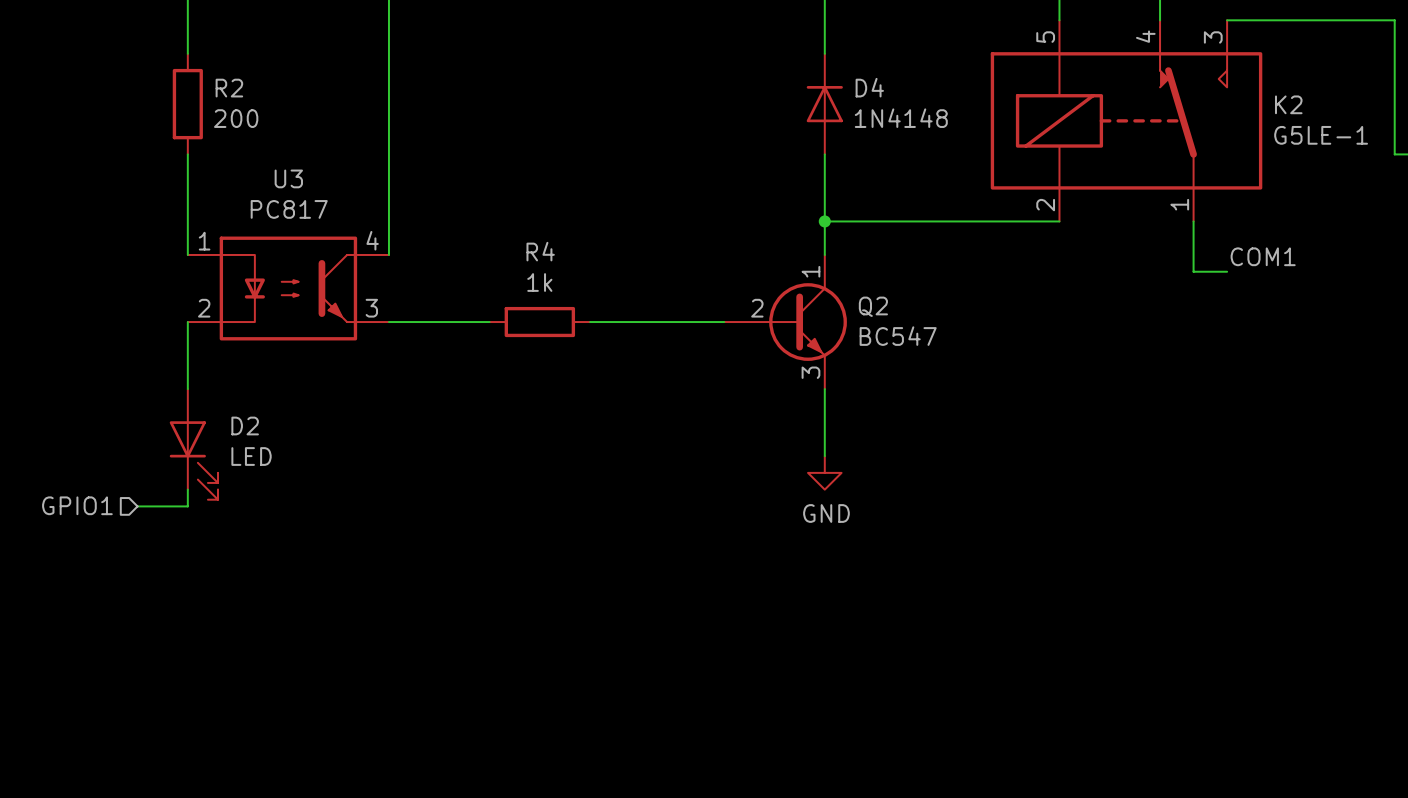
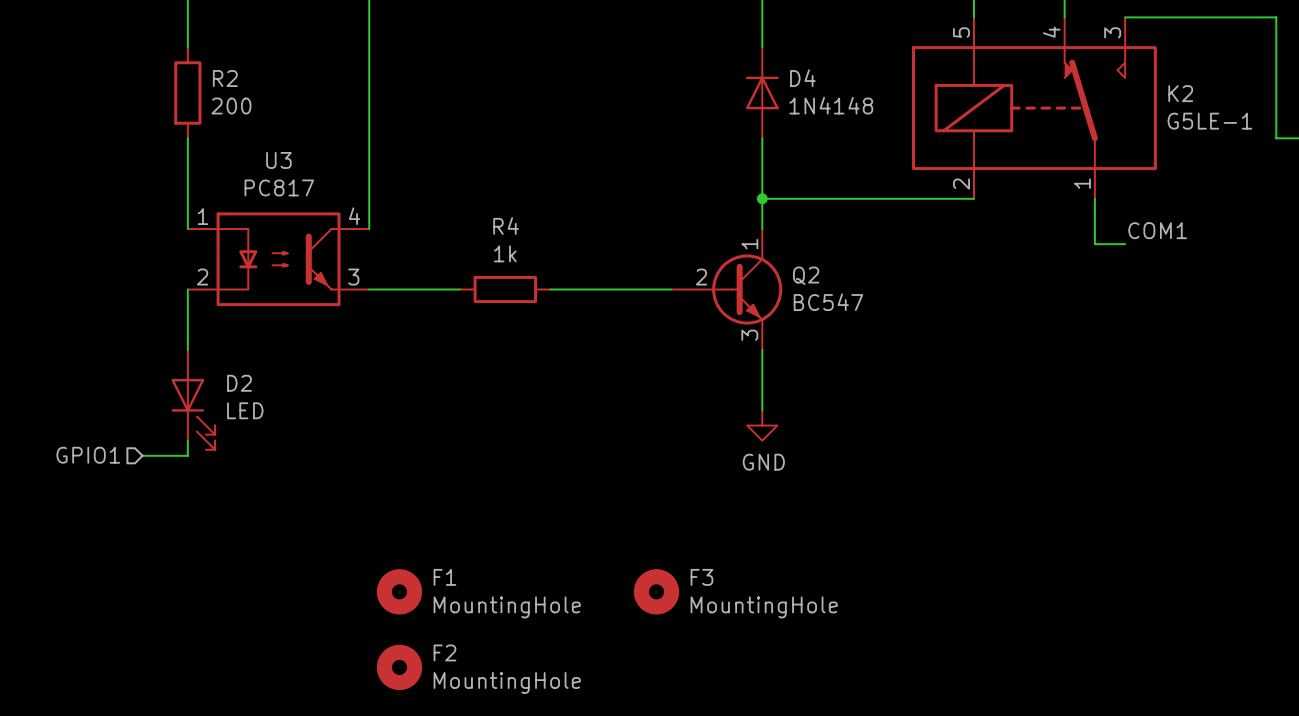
F1: none -> MountingHole (399, 591)
F3: none -> MountingHole (656, 591)
F2: none -> MountingHole (399, 667)

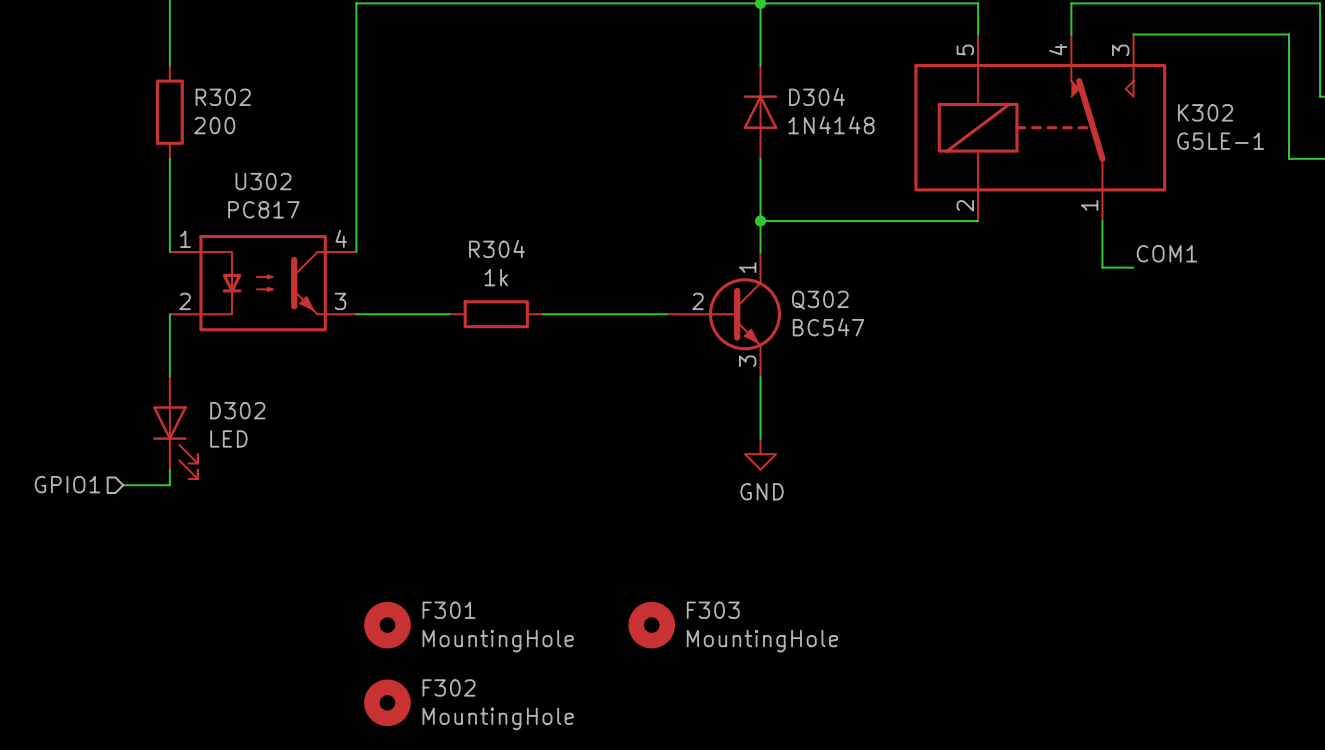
R2 name: R2 (225, 78) -> R302 (223, 97)
D4 name: D4 (802, 78) -> D304 (817, 96)
K2 name: K2 (1180, 93) -> K302 (1205, 112)
U3 name: U3 (278, 160) -> U302 (263, 181)
R4 name: R4 (506, 225) -> R304 (497, 248)
Q2 name: Q2 (806, 275) -> Q302 (820, 300)
D2 name: D2 (239, 383) -> D302 (237, 410)
F1 name: F1 (444, 577) -> F301 (449, 610)
F3 name: F3 (701, 577) -> F303 (713, 610)
F2 name: F2 (444, 652) -> F302 (449, 687)

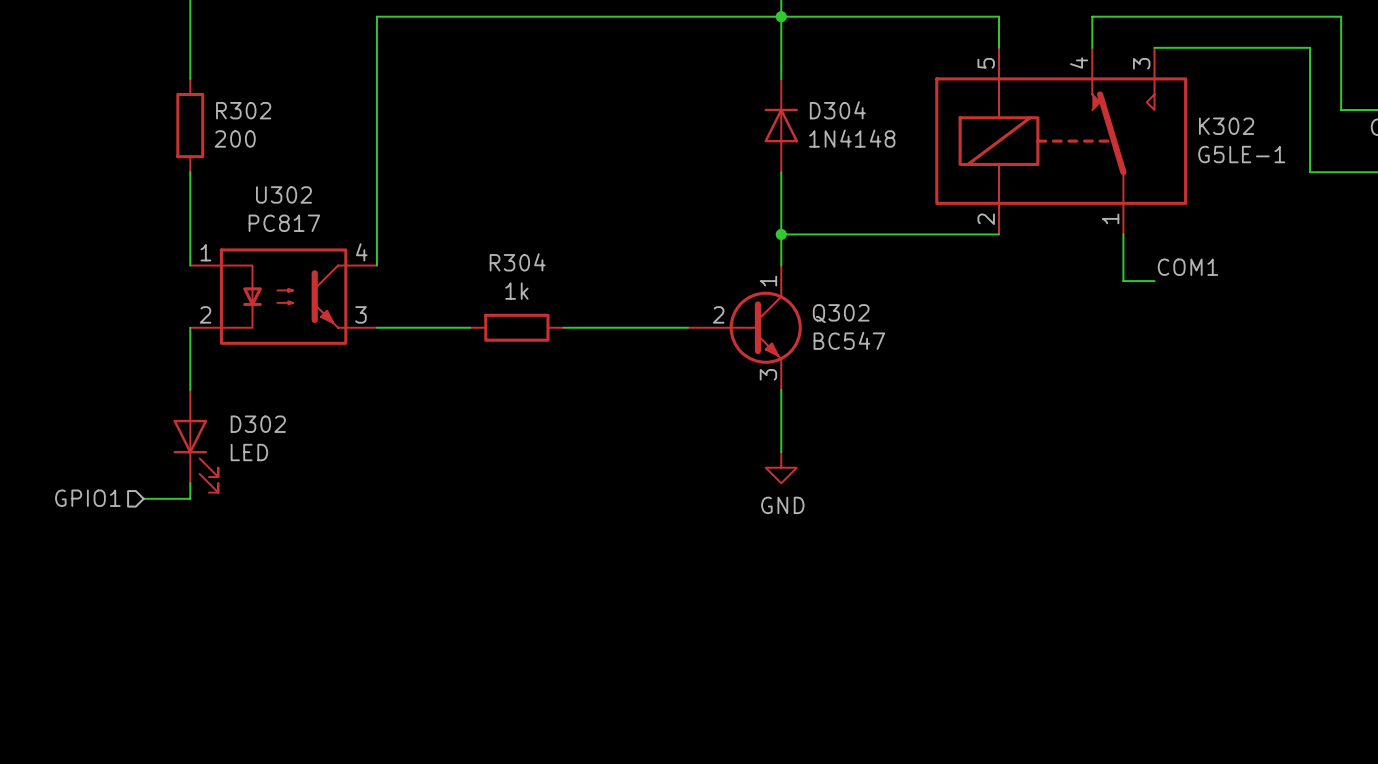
F301: MountingHole (387, 625) -> none
F303: MountingHole (651, 625) -> none
F302: MountingHole (387, 702) -> none

